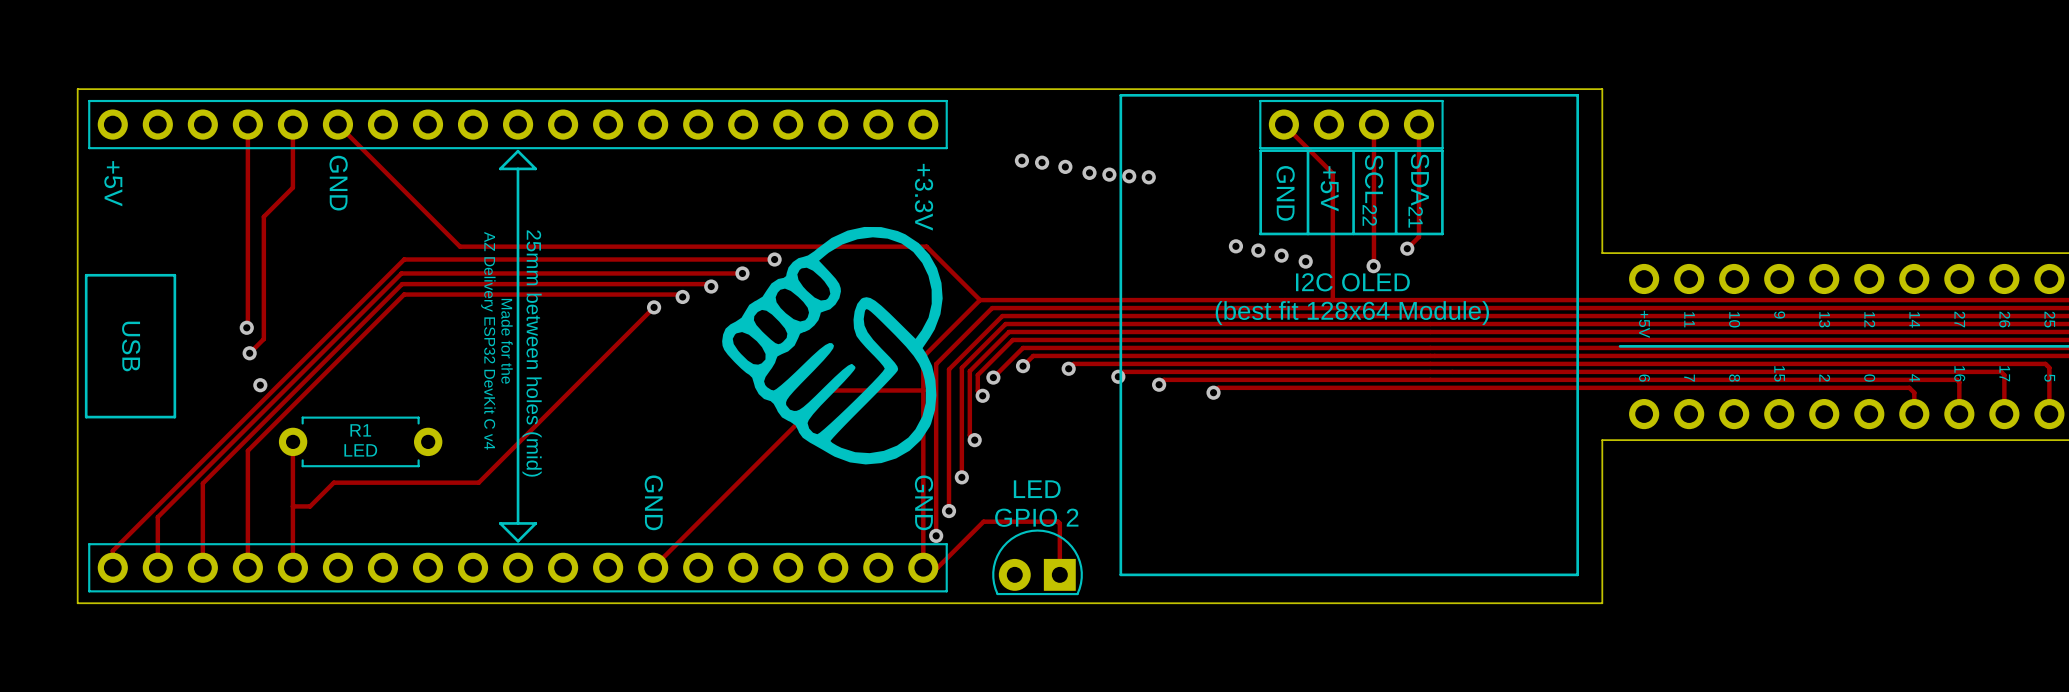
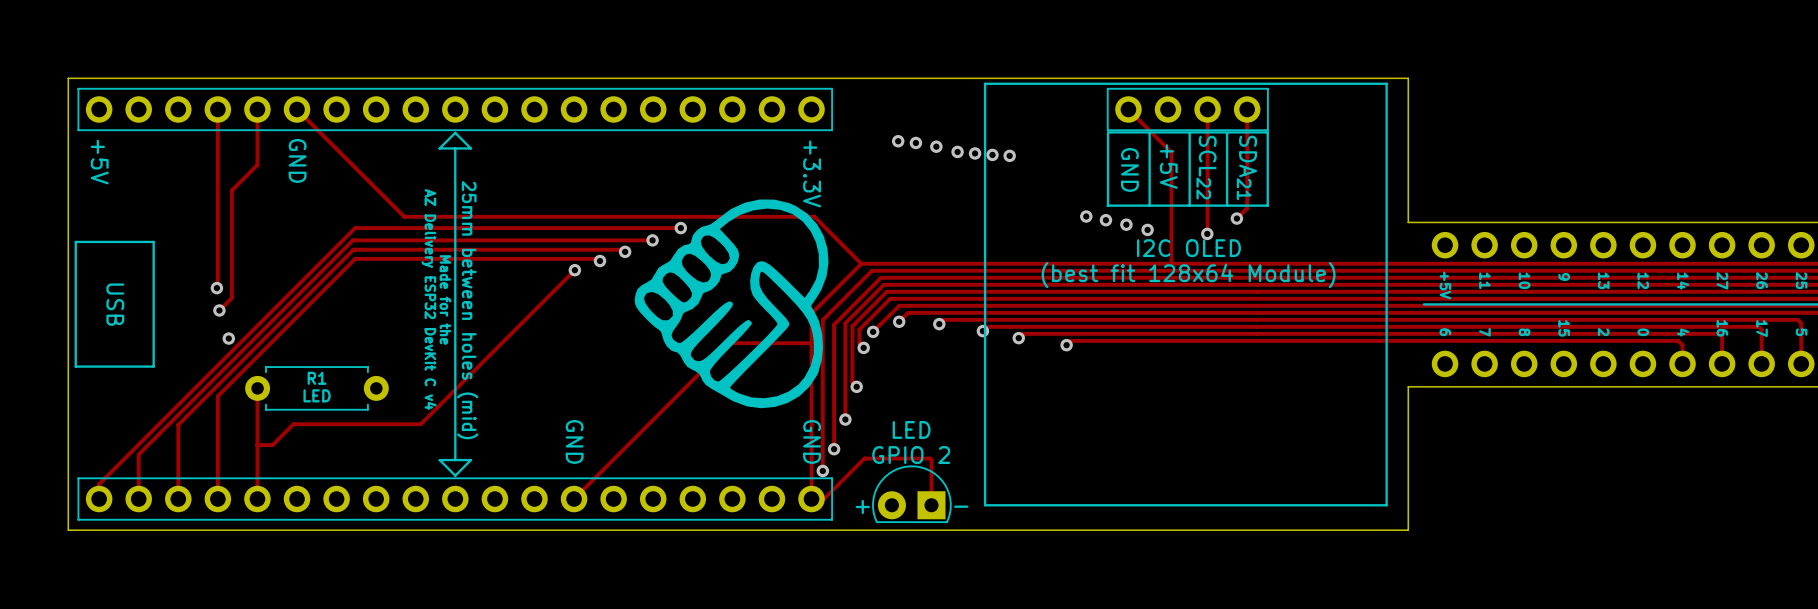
text: none -> + (862, 507)
text: none -> - (961, 506)

